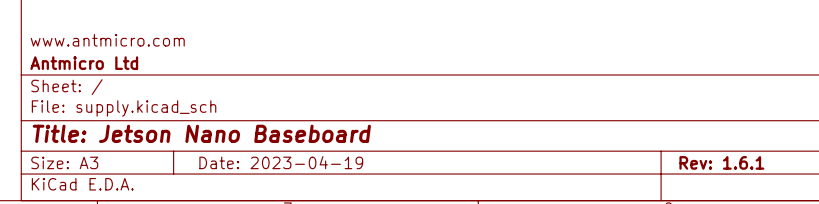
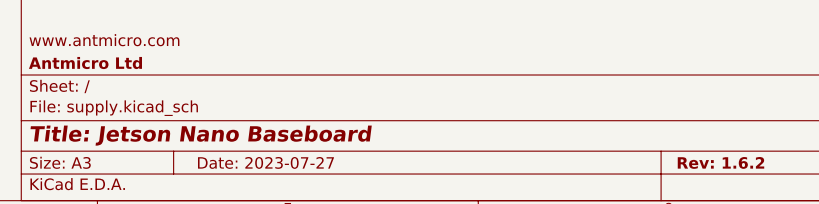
title block: Date: 2023-04-19 (281, 162) -> Date: 2023-07-27 (265, 162)
title block: Rev: 1.6.1 (721, 162) -> Rev: 1.6.2 (720, 162)

